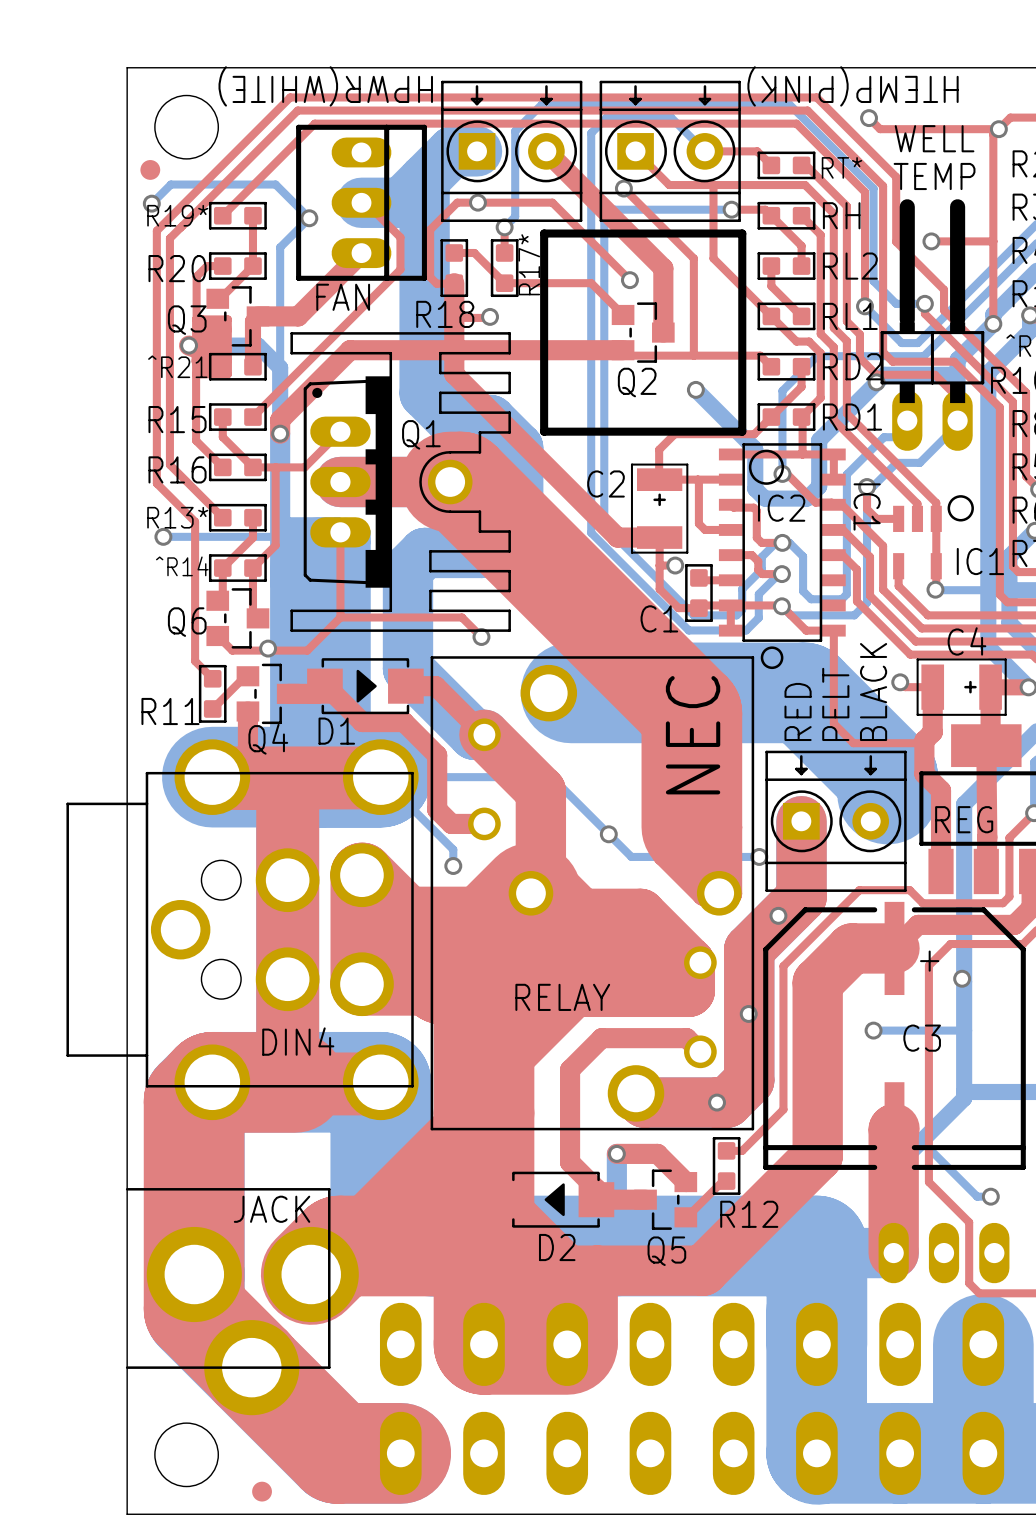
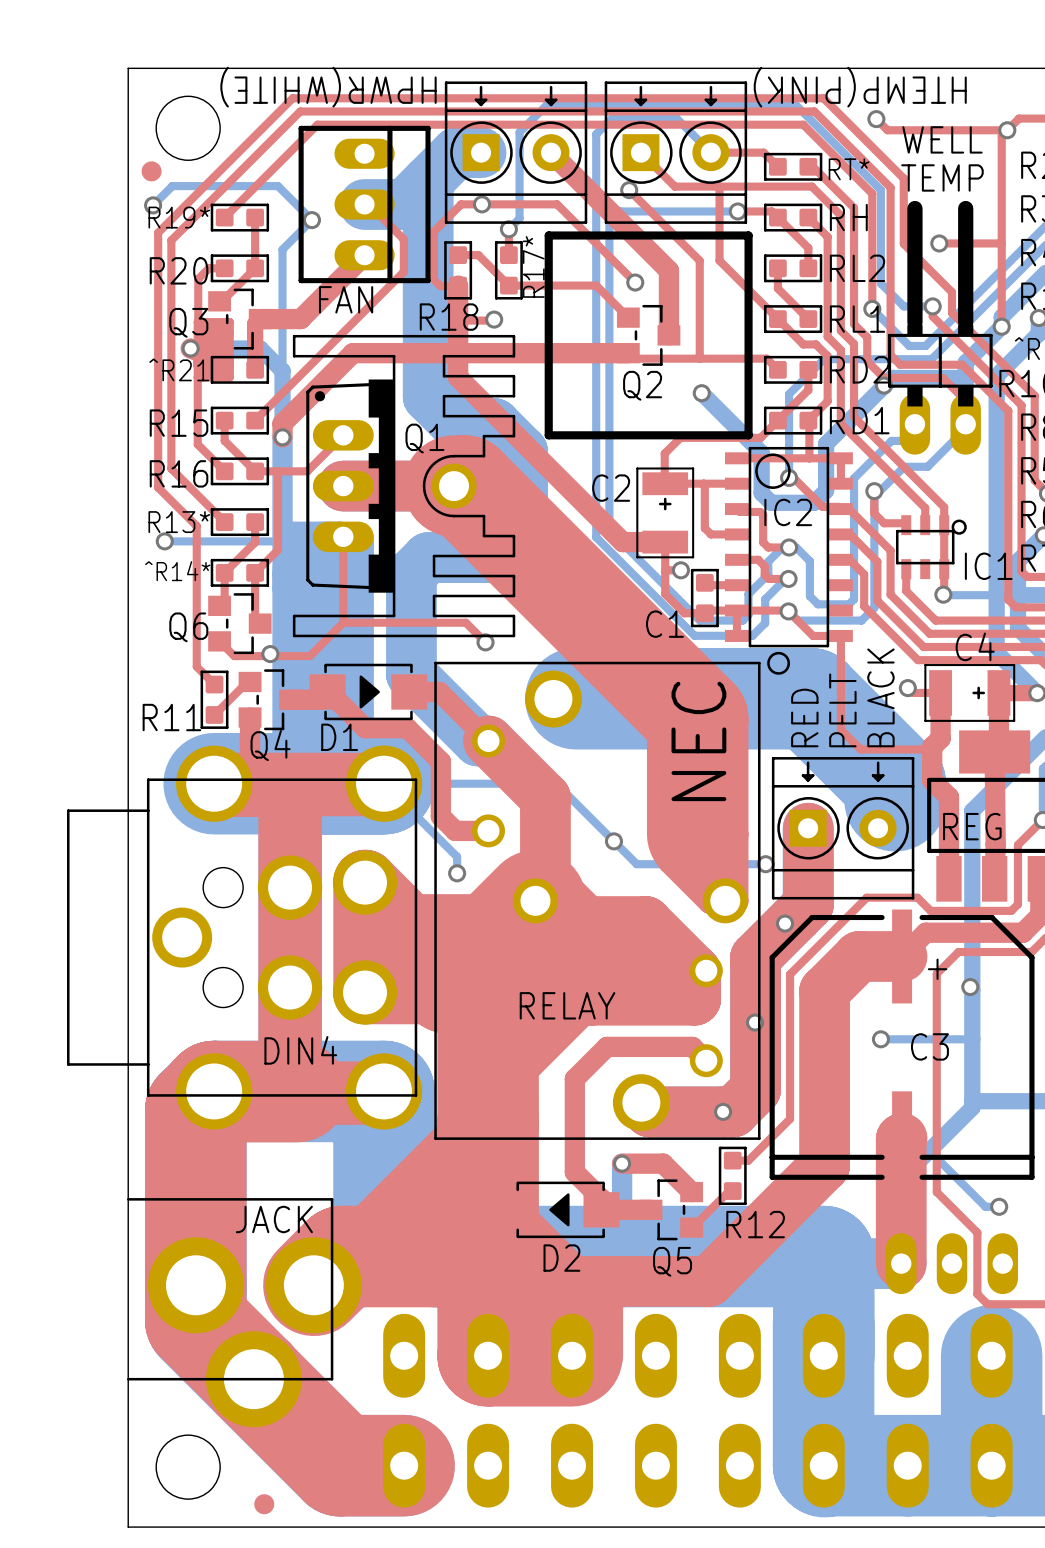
IC1: (933, 537) -> none
part: none -> (931, 547)
text: ^R14 (182, 566) -> ^R14* (177, 571)

